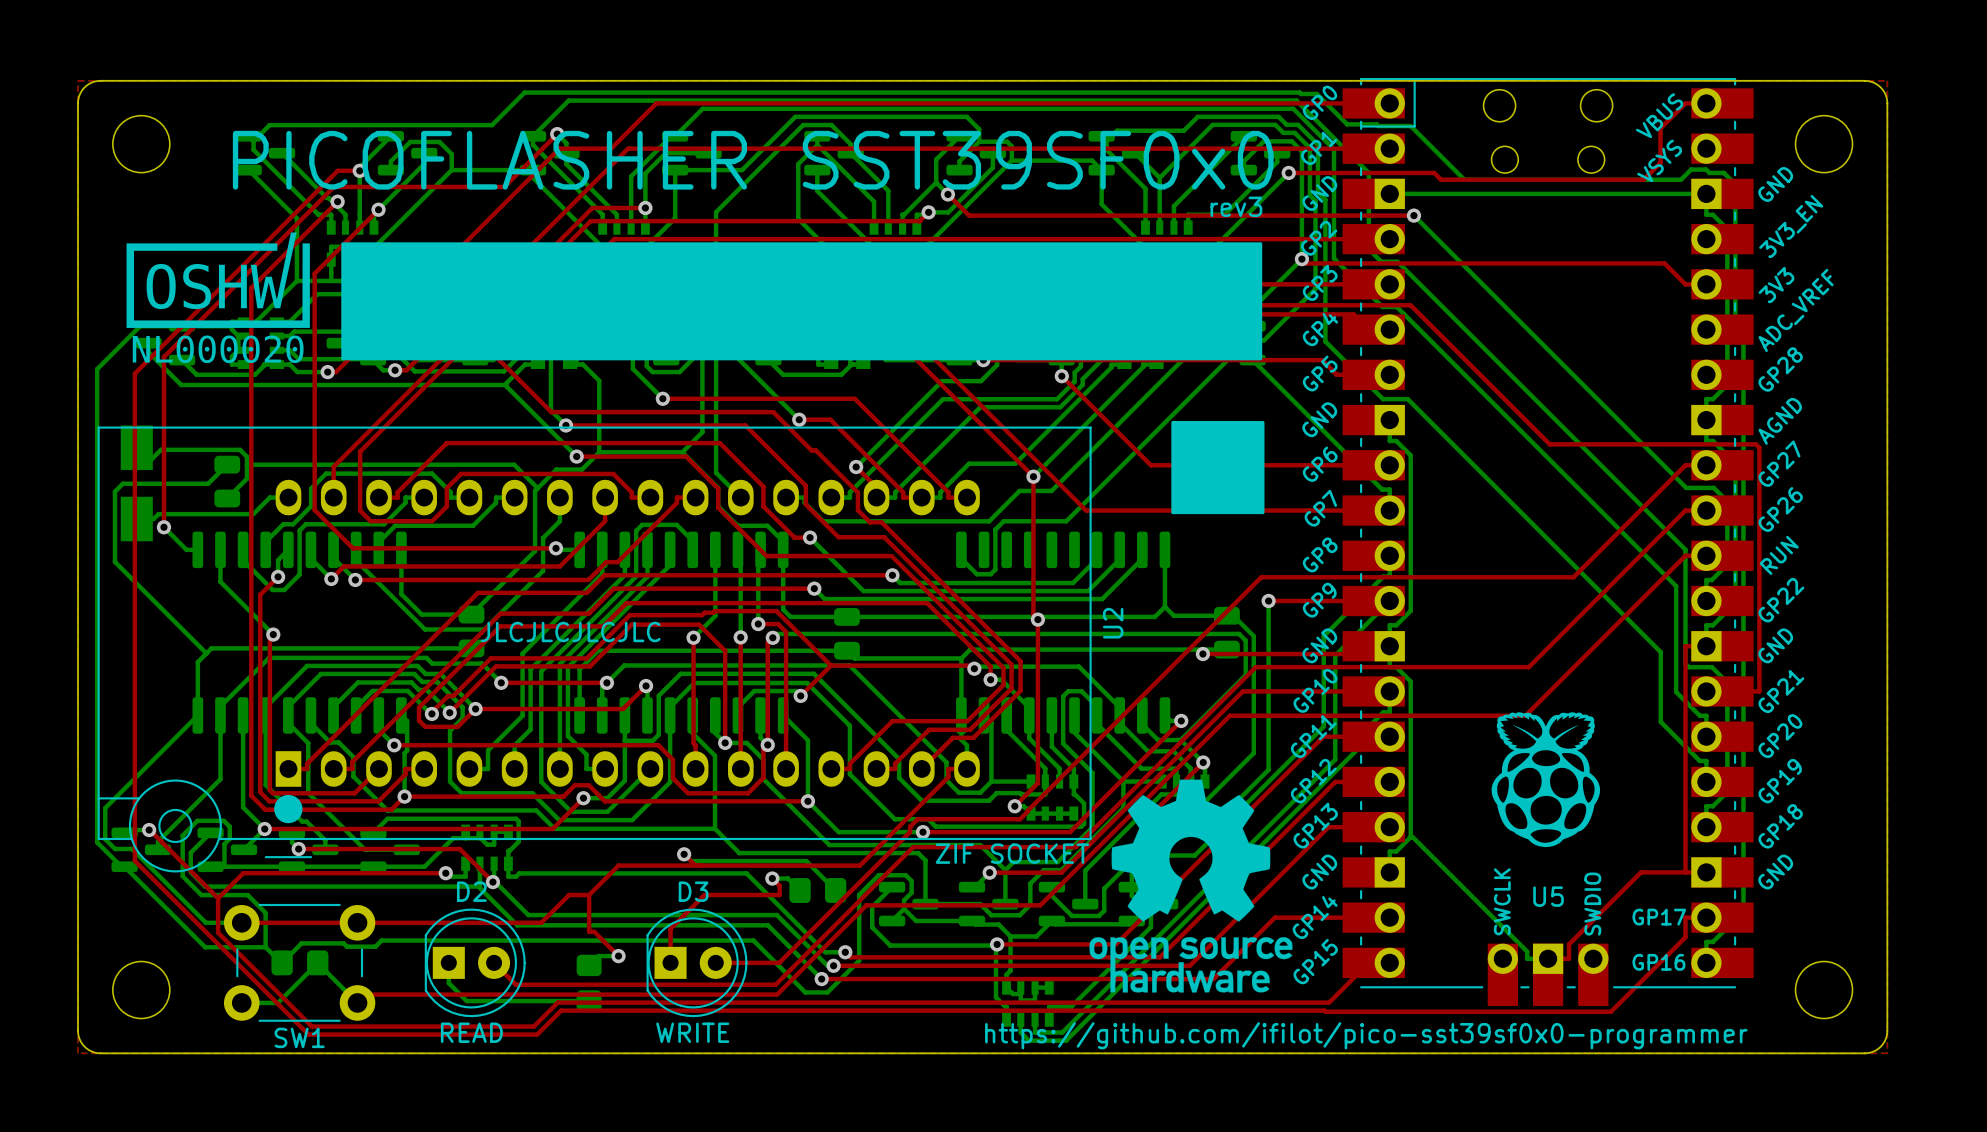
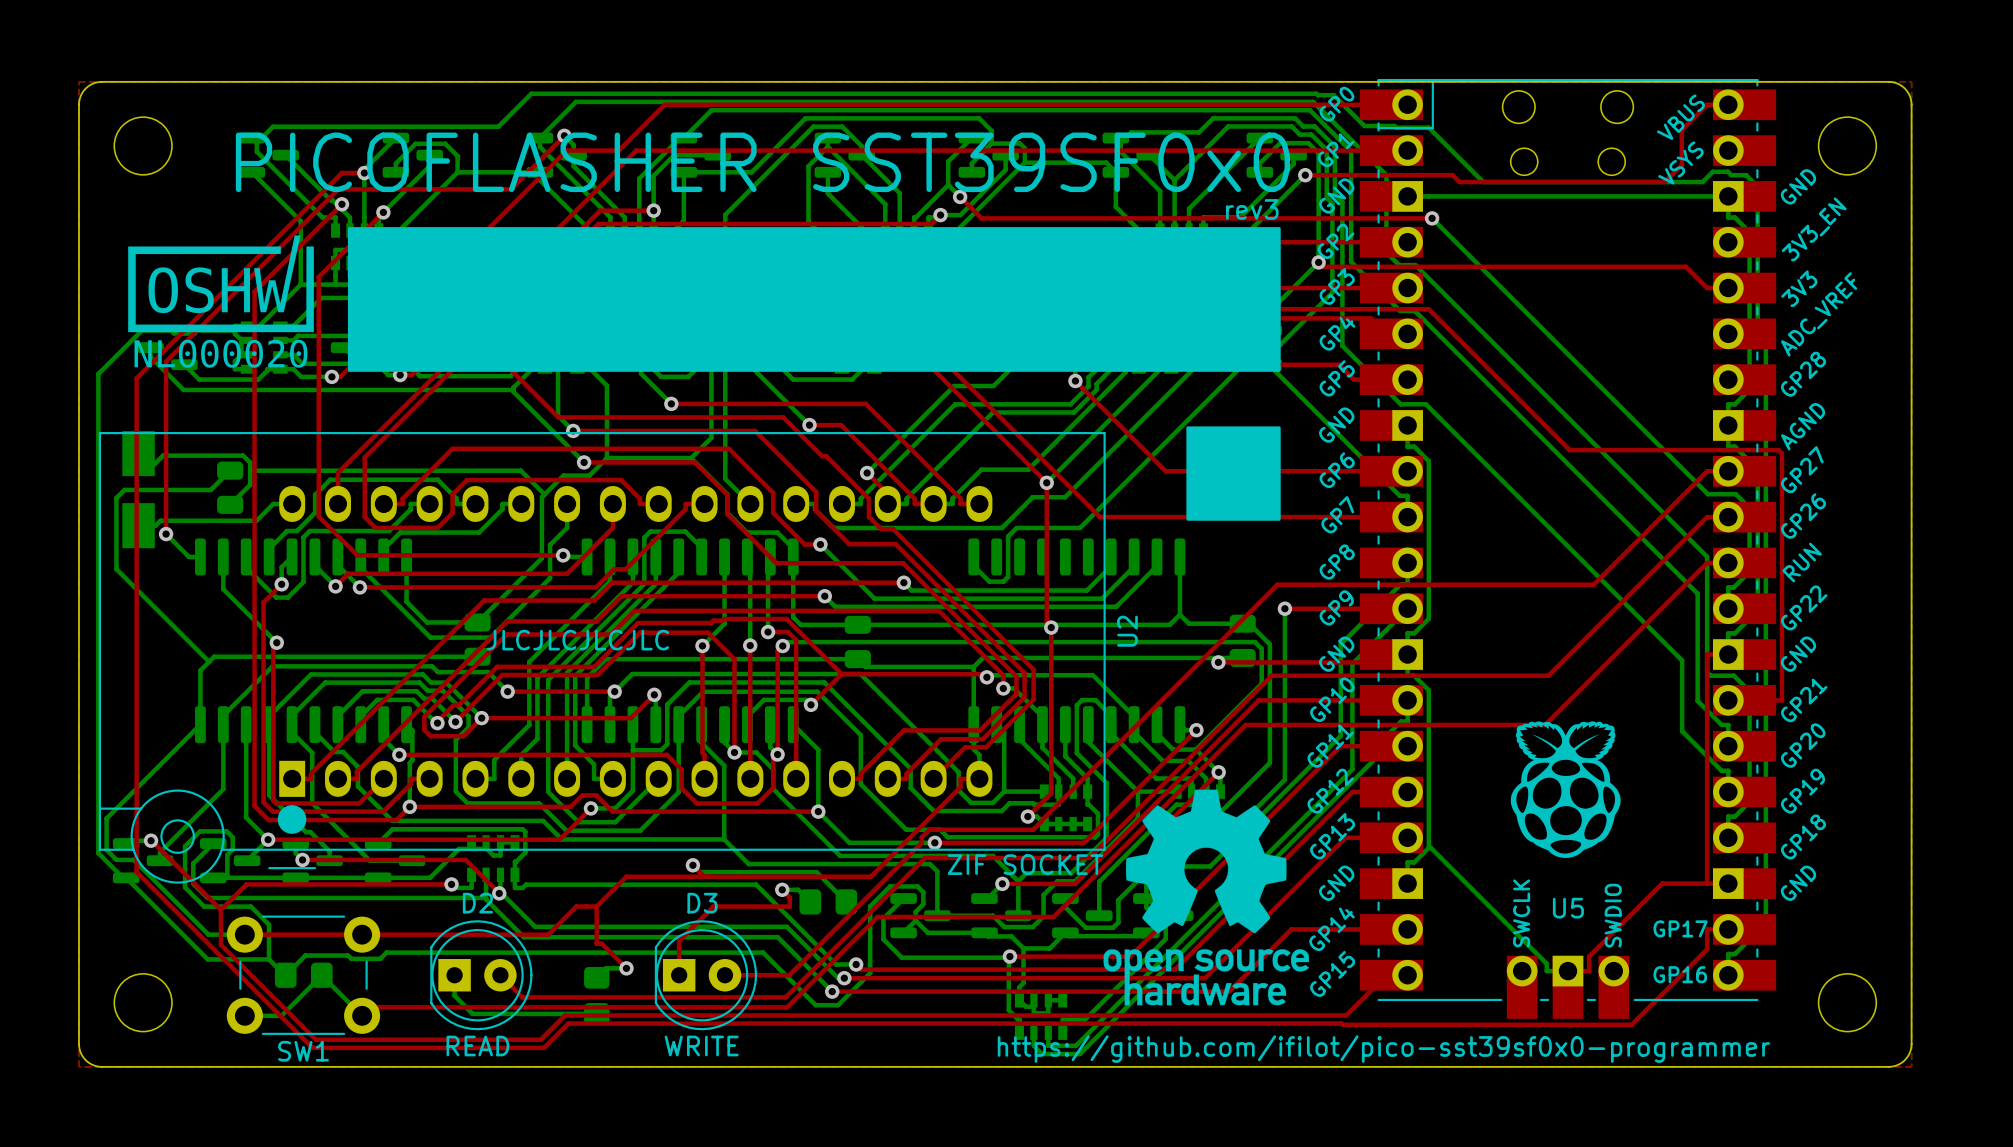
drawing shape: [341, 242, 1263, 361] -> [347, 227, 1281, 372]

